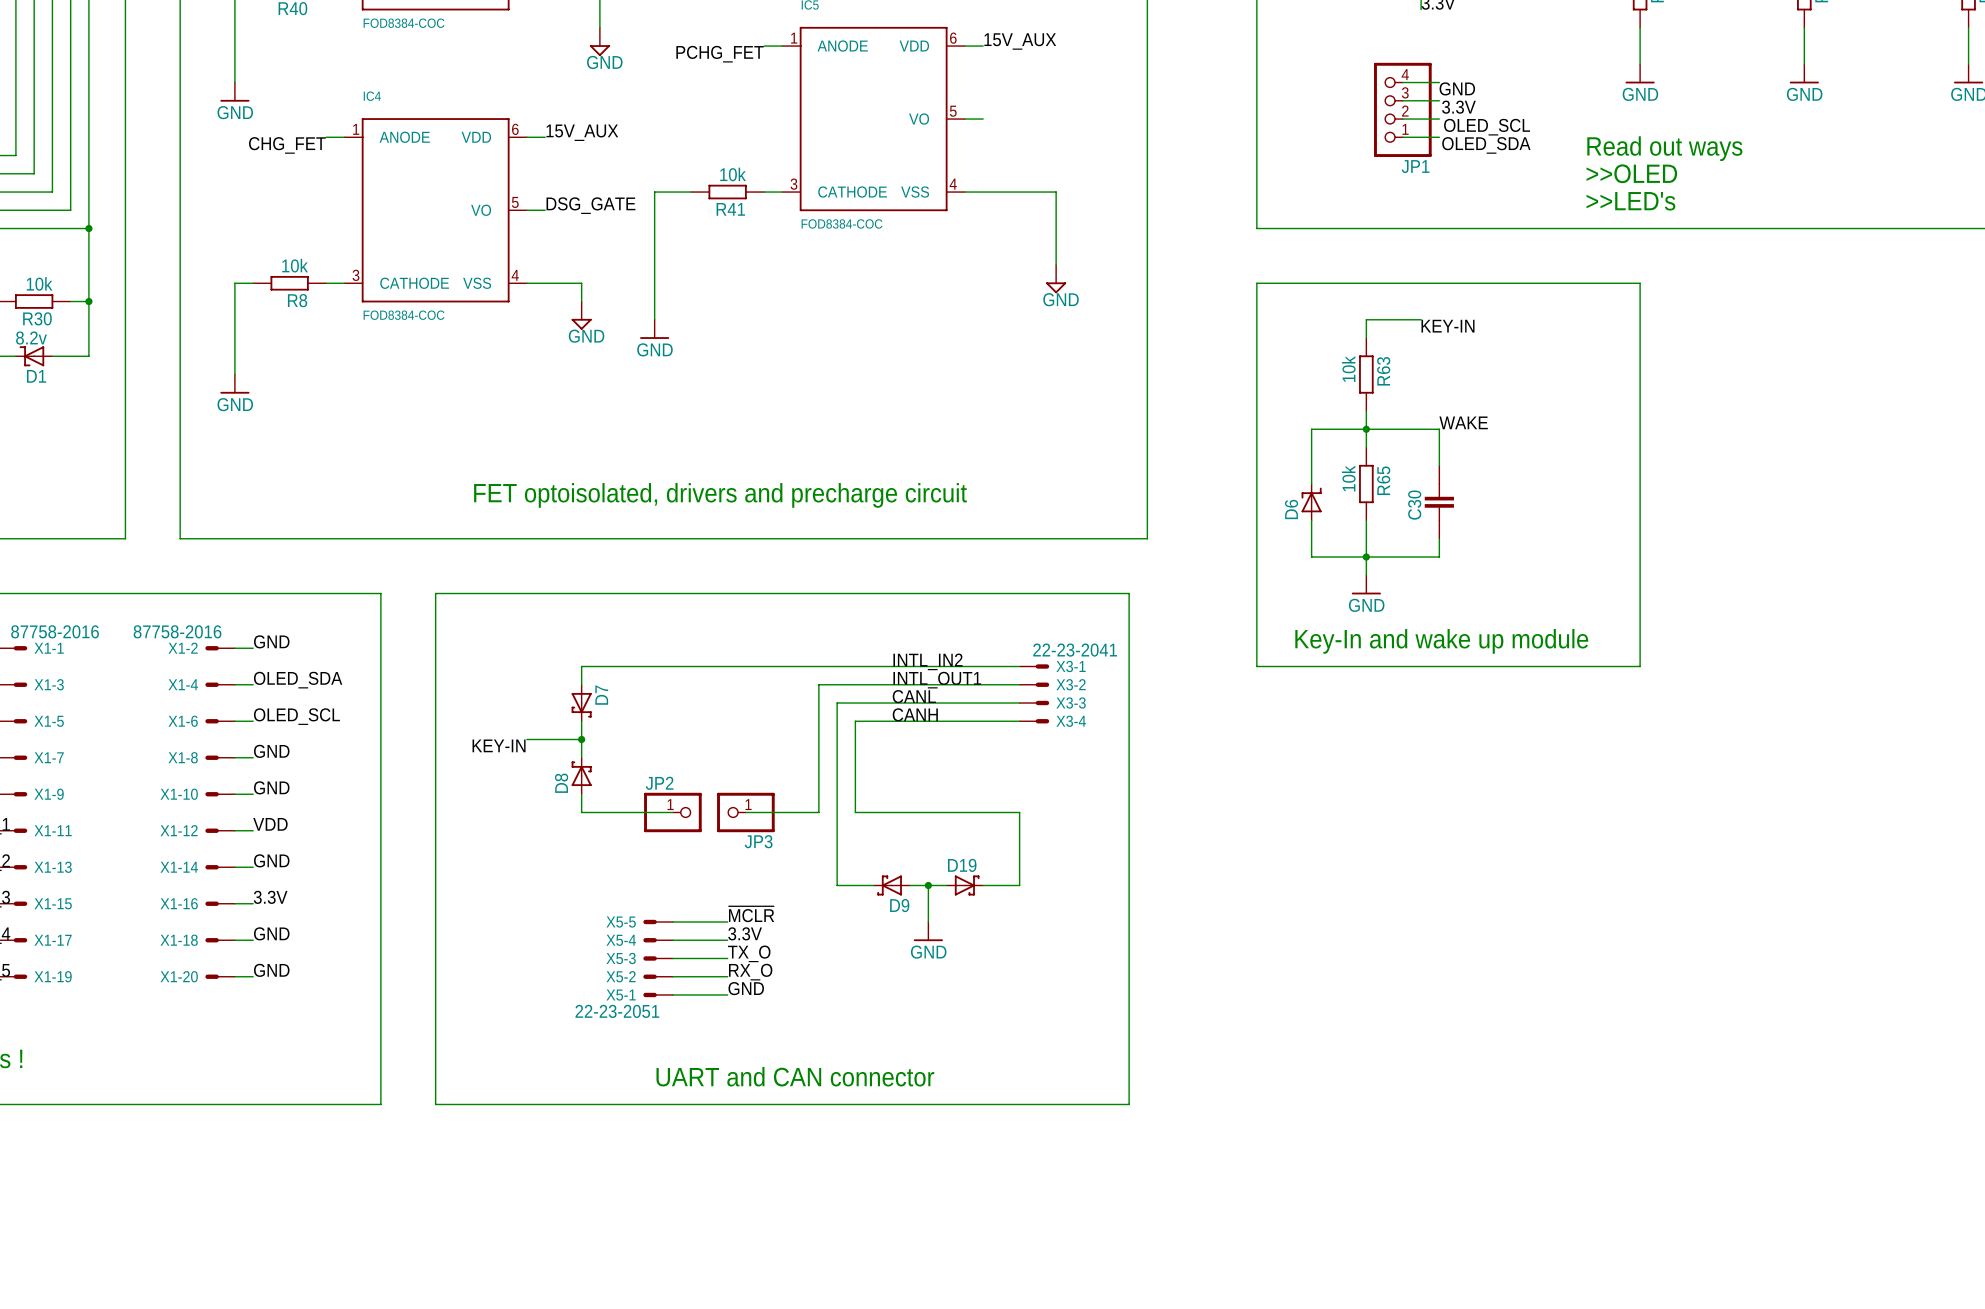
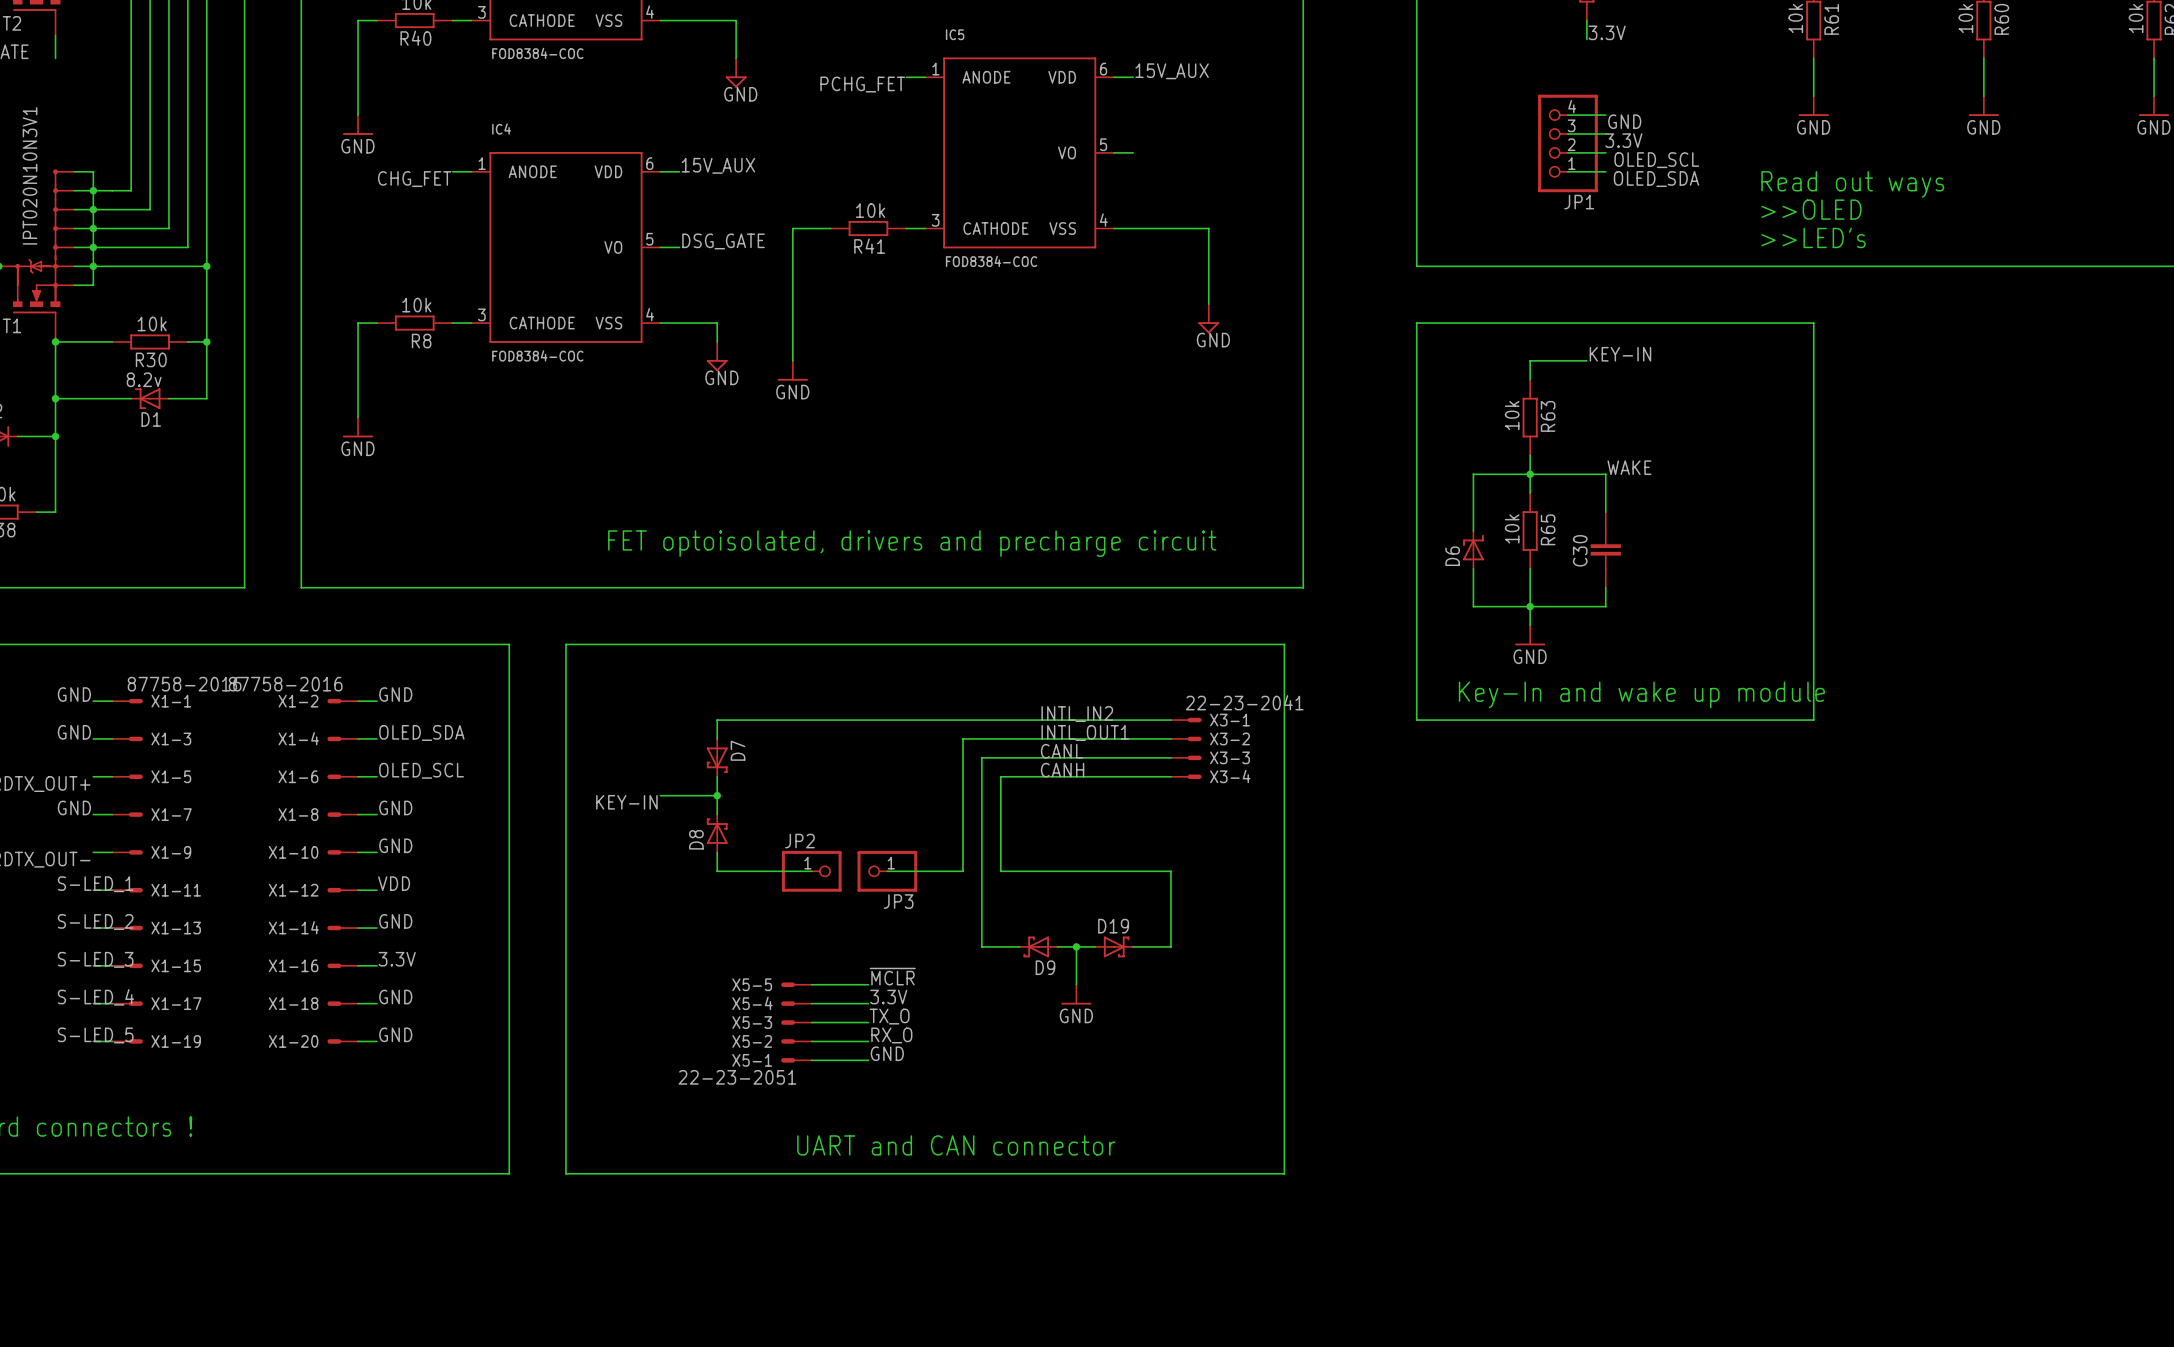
label position: KEY-IN (1448, 326) -> KEY-IN (1620, 354)

